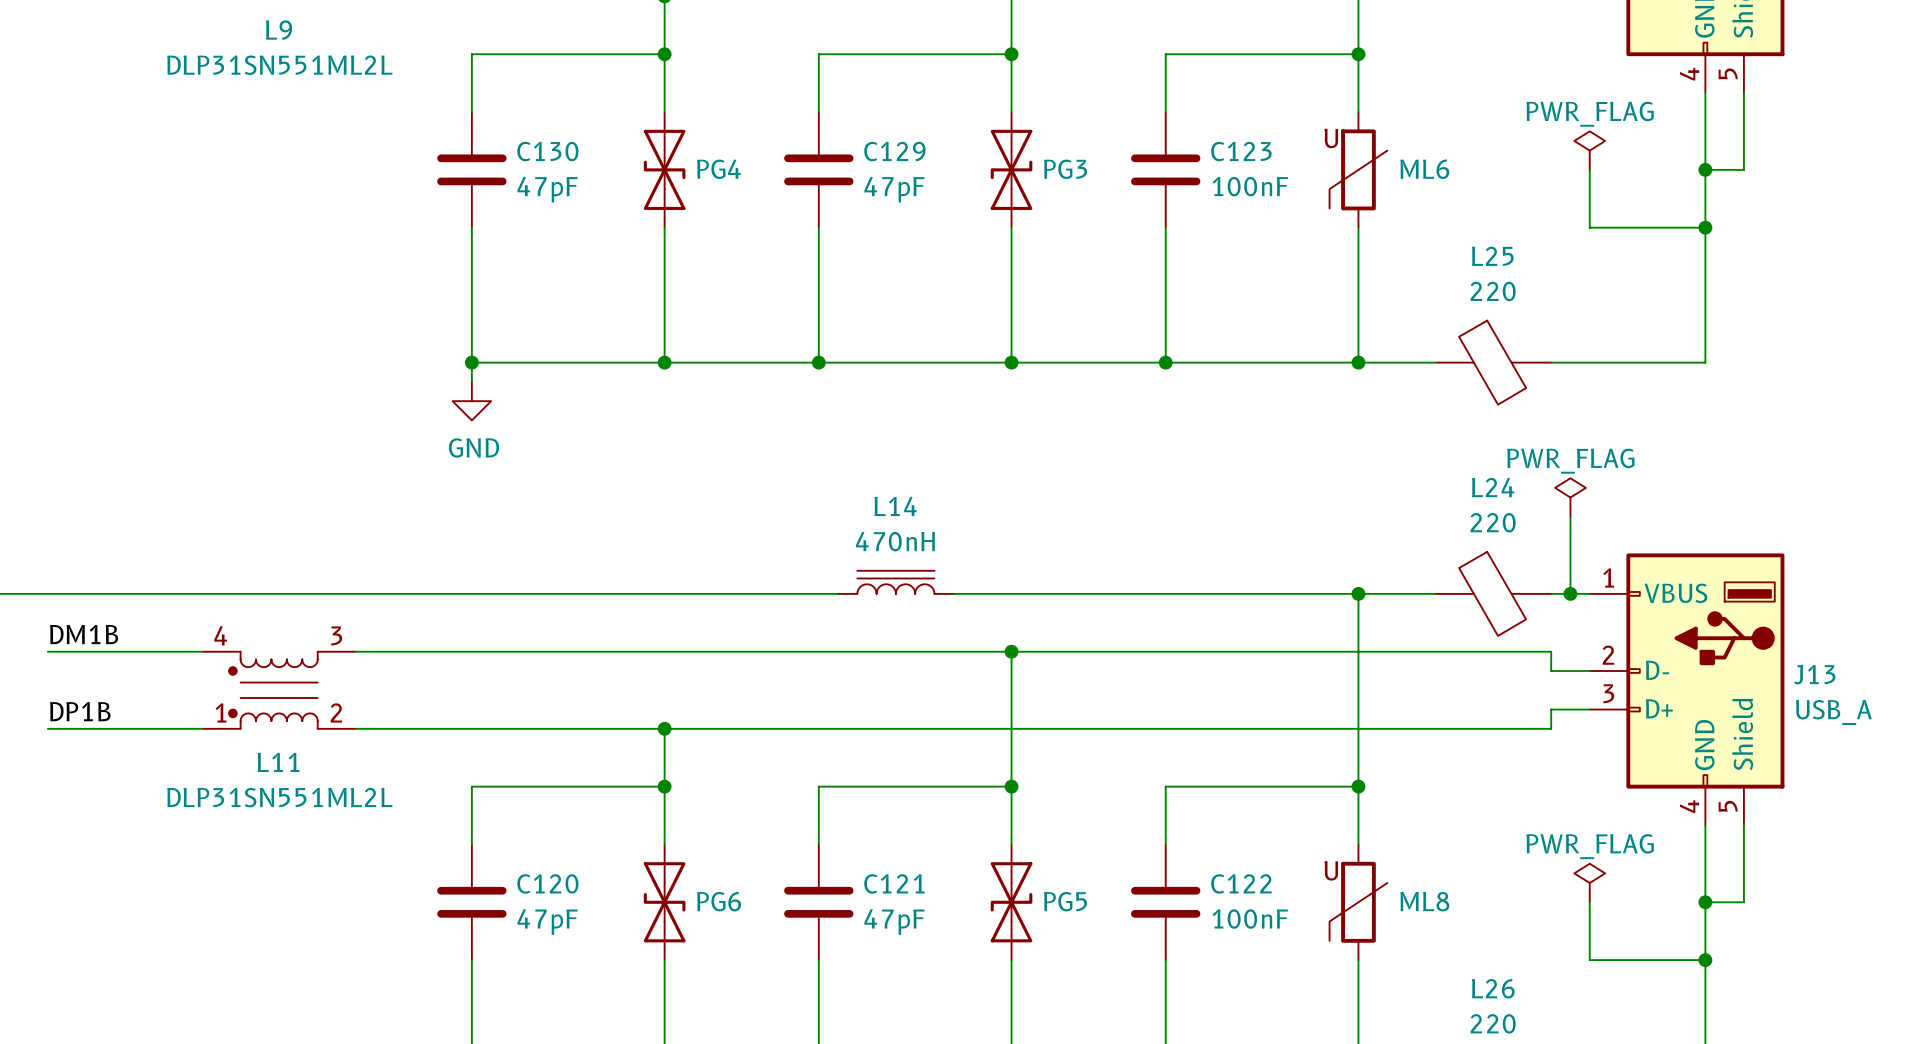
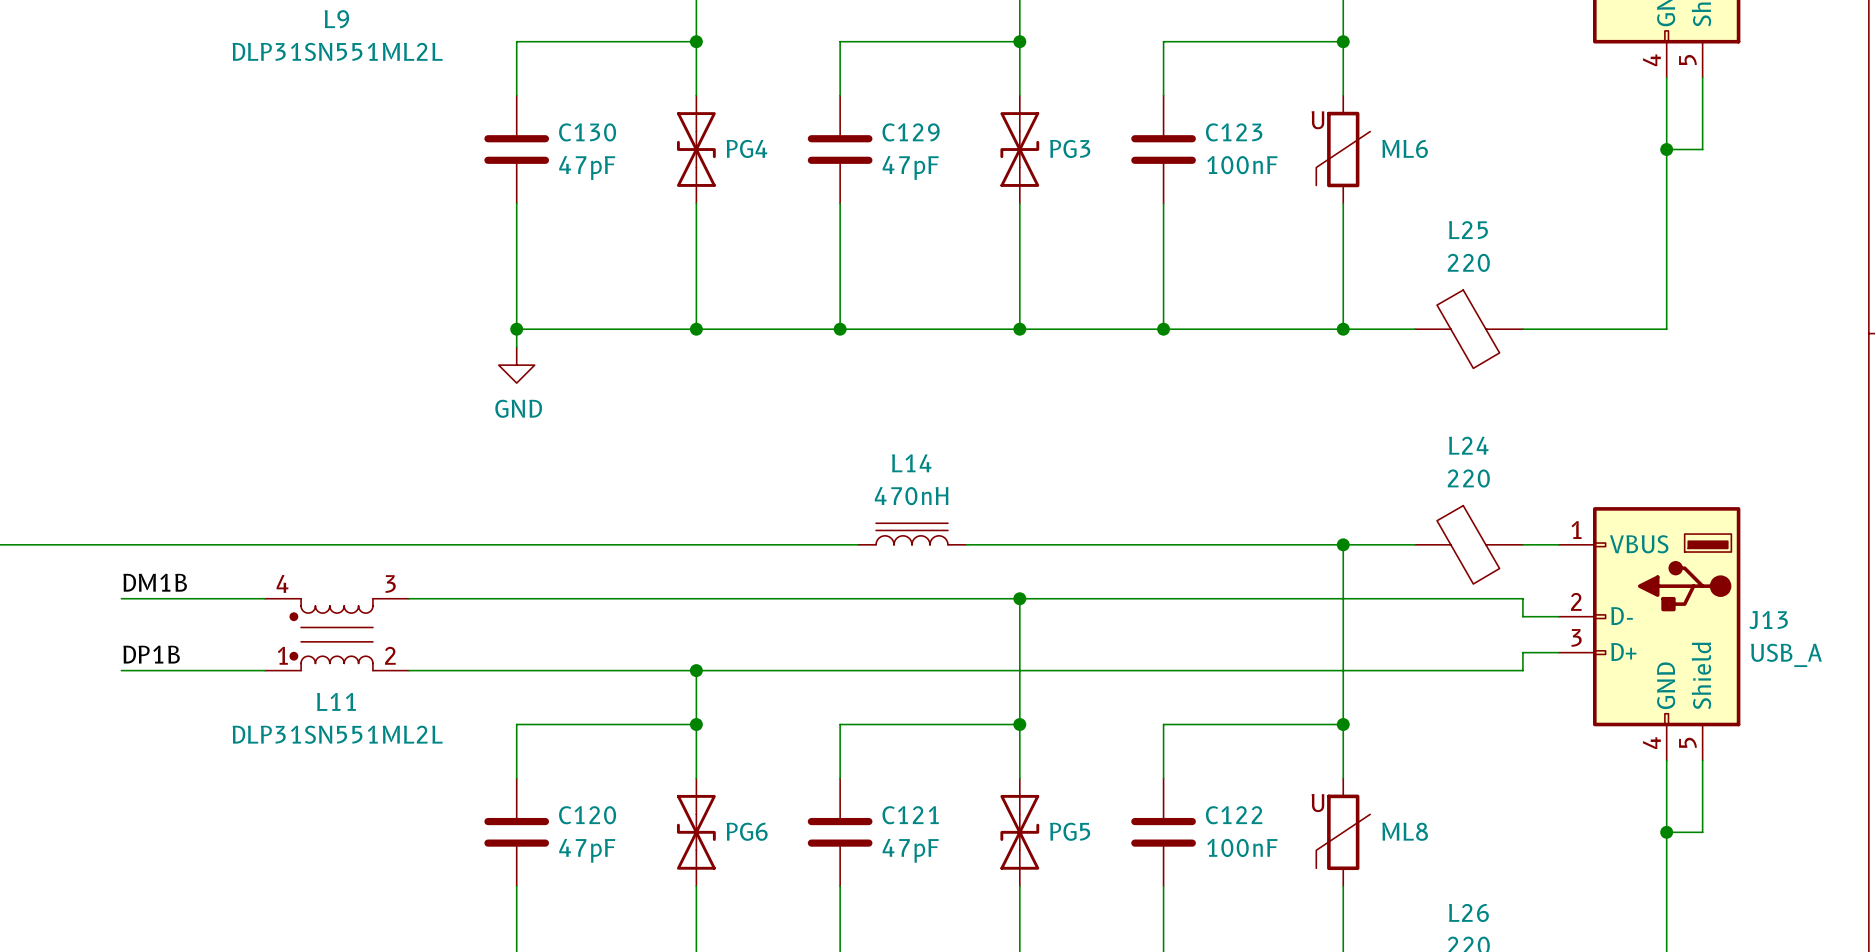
power symbol: PWR_FLAG (1589, 150) -> none
wire: (1589, 169) (1589, 227) (1705, 227) -> none
junction: (1705, 227) -> none
power symbol: PWR_FLAG (1570, 497) -> none
wire: (1570, 516) (1570, 593) -> none
junction: (1570, 593) -> none
power symbol: PWR_FLAG (1589, 883) -> none
wire: (1589, 902) (1589, 960) (1705, 960) -> none
junction: (1705, 960) -> none

